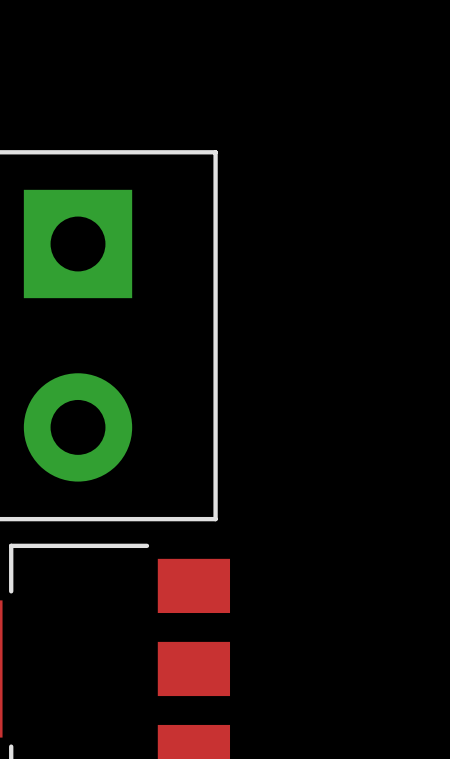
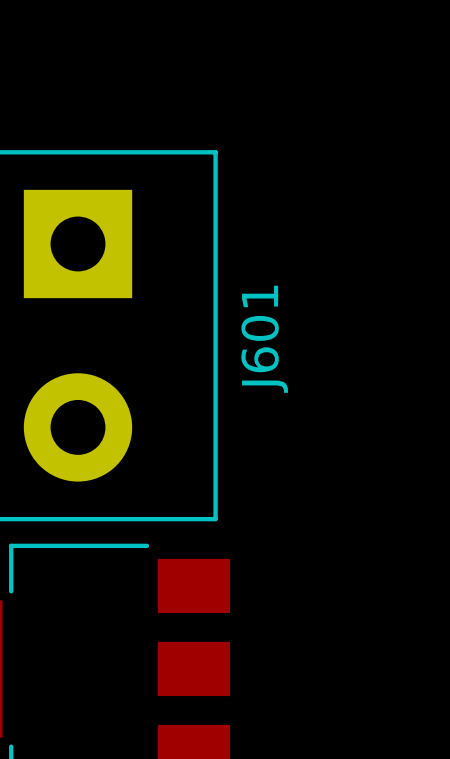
J601 name: none -> J601 (264, 339)

